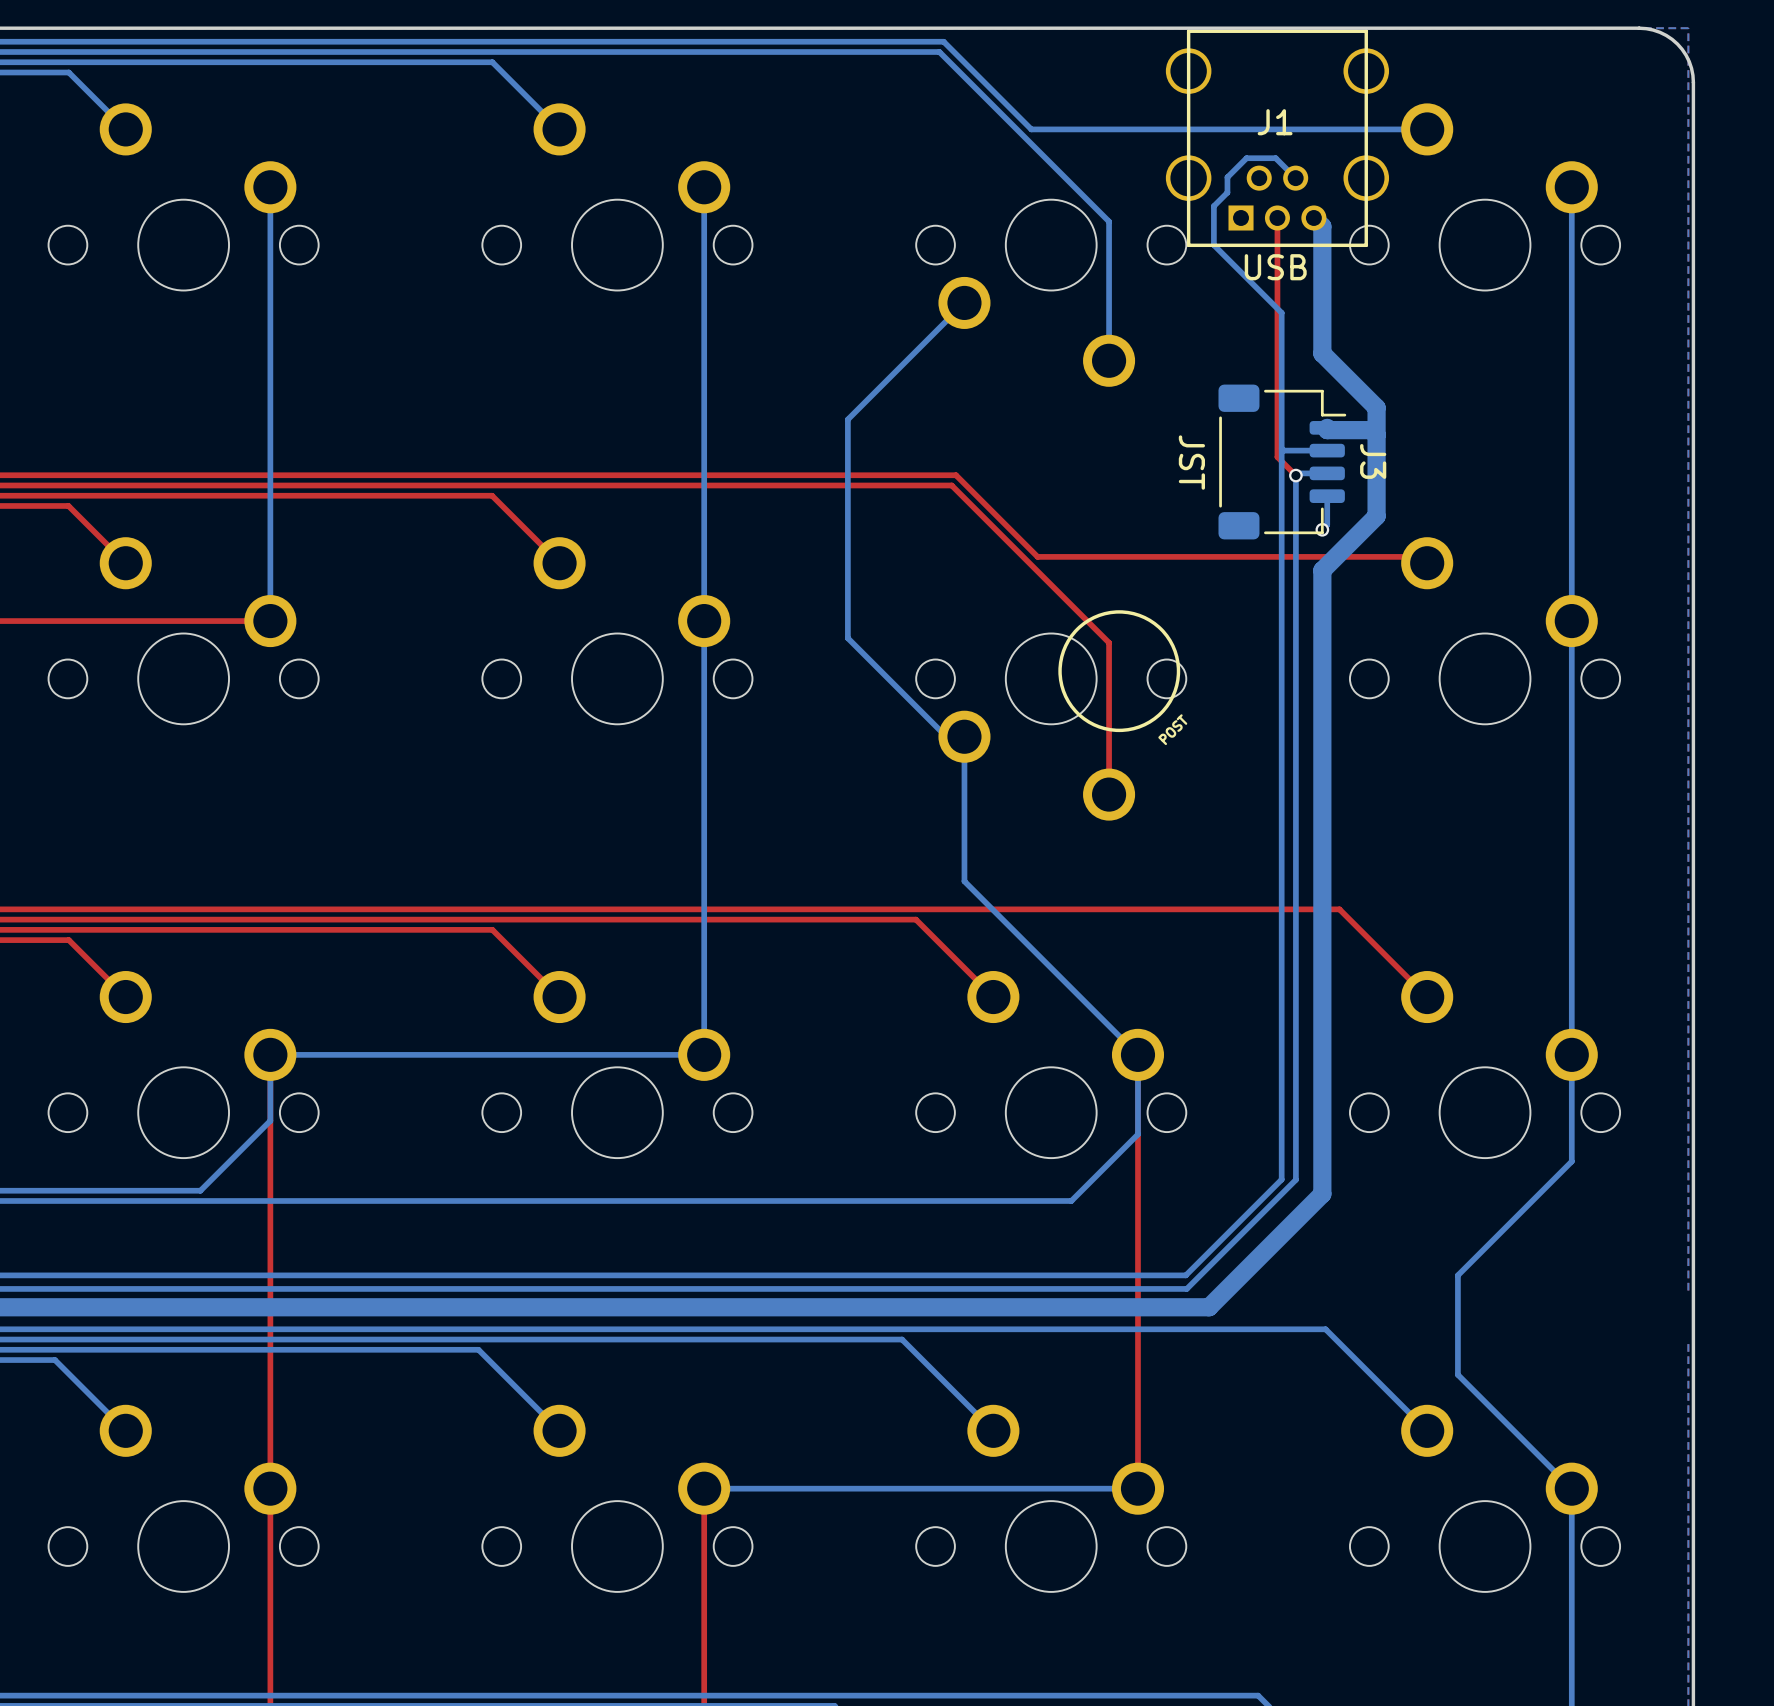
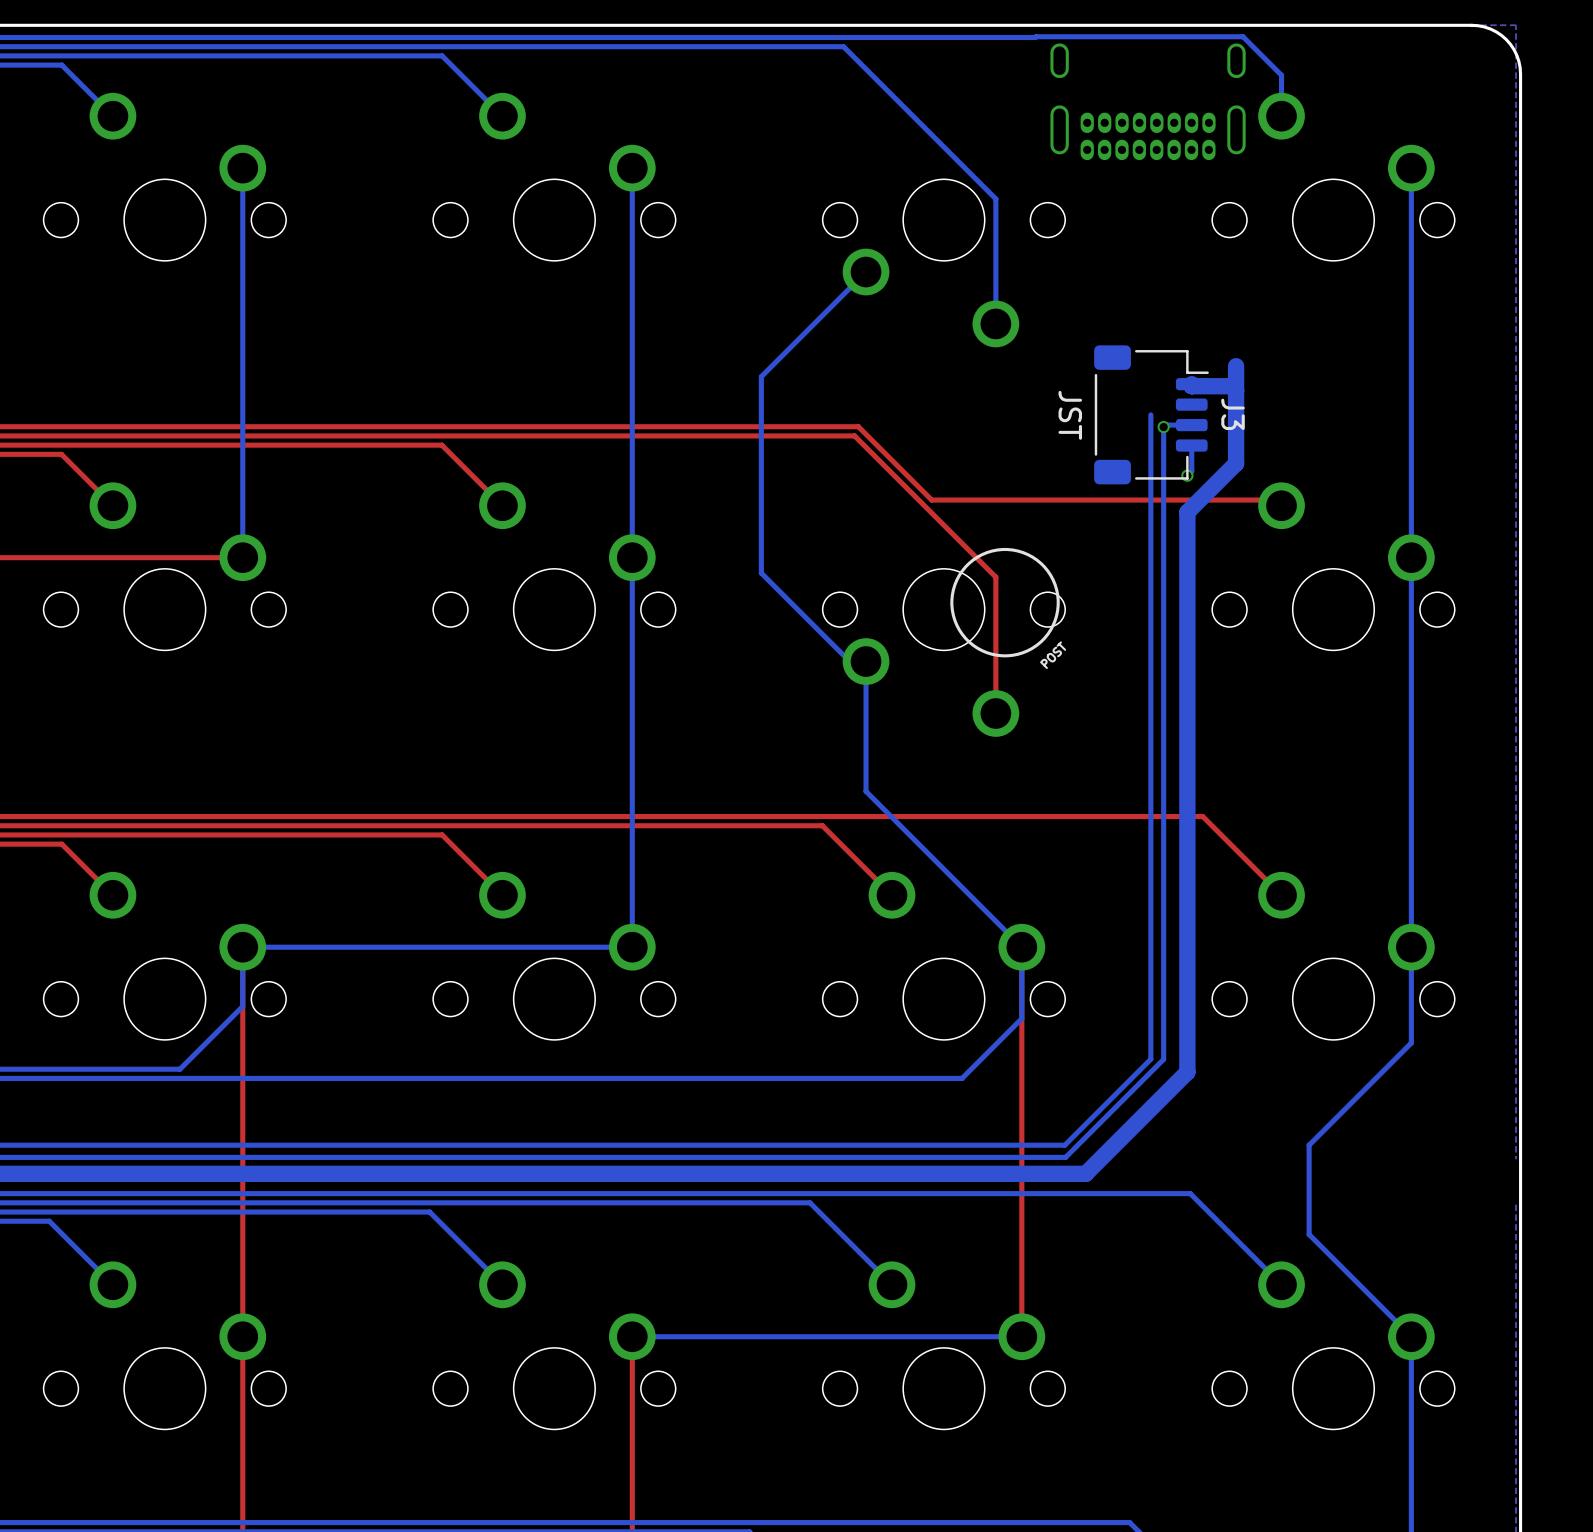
bottom track: (943, 41) (1031, 129) (1427, 129) -> (847, 37) (1243, 36) (1281, 75) (1281, 116)
part: none -> (1148, 101)
J1: USB (1277, 138) -> none
bottom track: (1295, 178) (1275, 158) (1246, 158) (1227, 177) (1227, 192) (1213, 206) (1213, 245) (1281, 312) (1281, 462) -> none
top track: (1277, 217) (1277, 457) (1295, 475) -> none
bottom track: (1313, 217) (1322, 226) (1322, 353) (1376, 407) -> none
bottom track: (1281, 448) (1283, 450) (1327, 450) -> none

